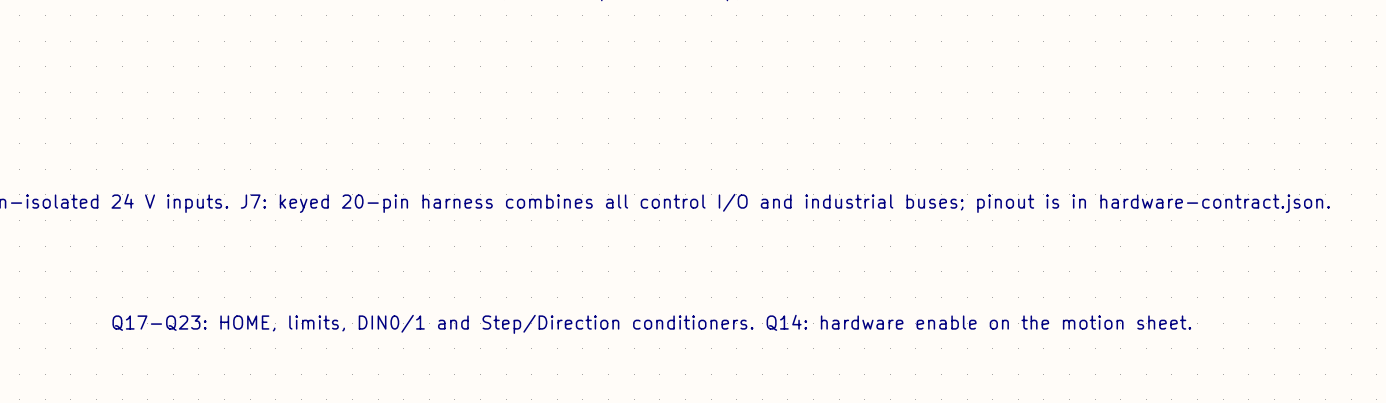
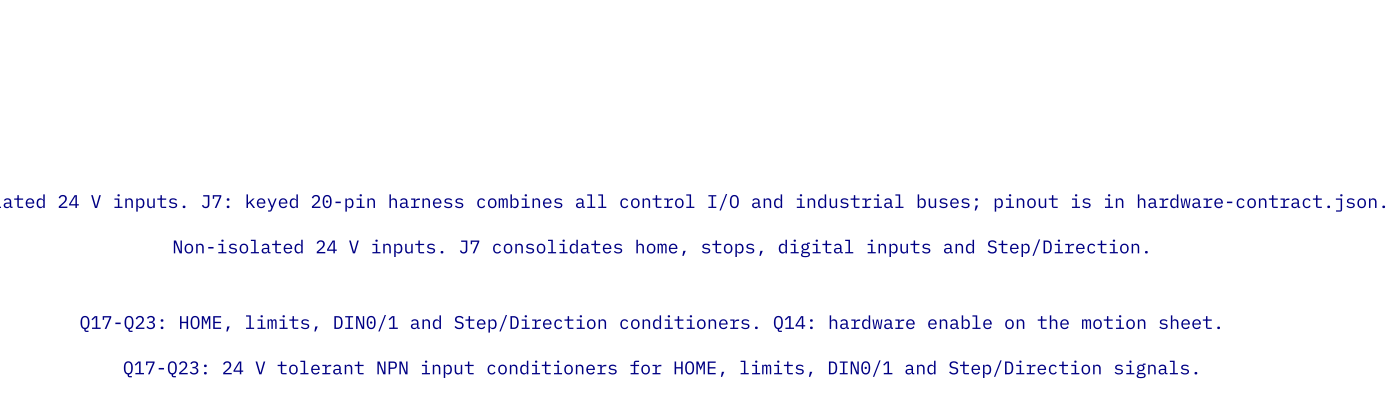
text: none -> Non-isolated 24 V inputs. J7 consolidates home, stops, digital inputs and Step/Direction. (660, 248)
text: none -> Q17-Q23: 24 V tolerant NPN input conditioners for HOME, limits, DIN0/1 and Step/Direction signals. (660, 369)

